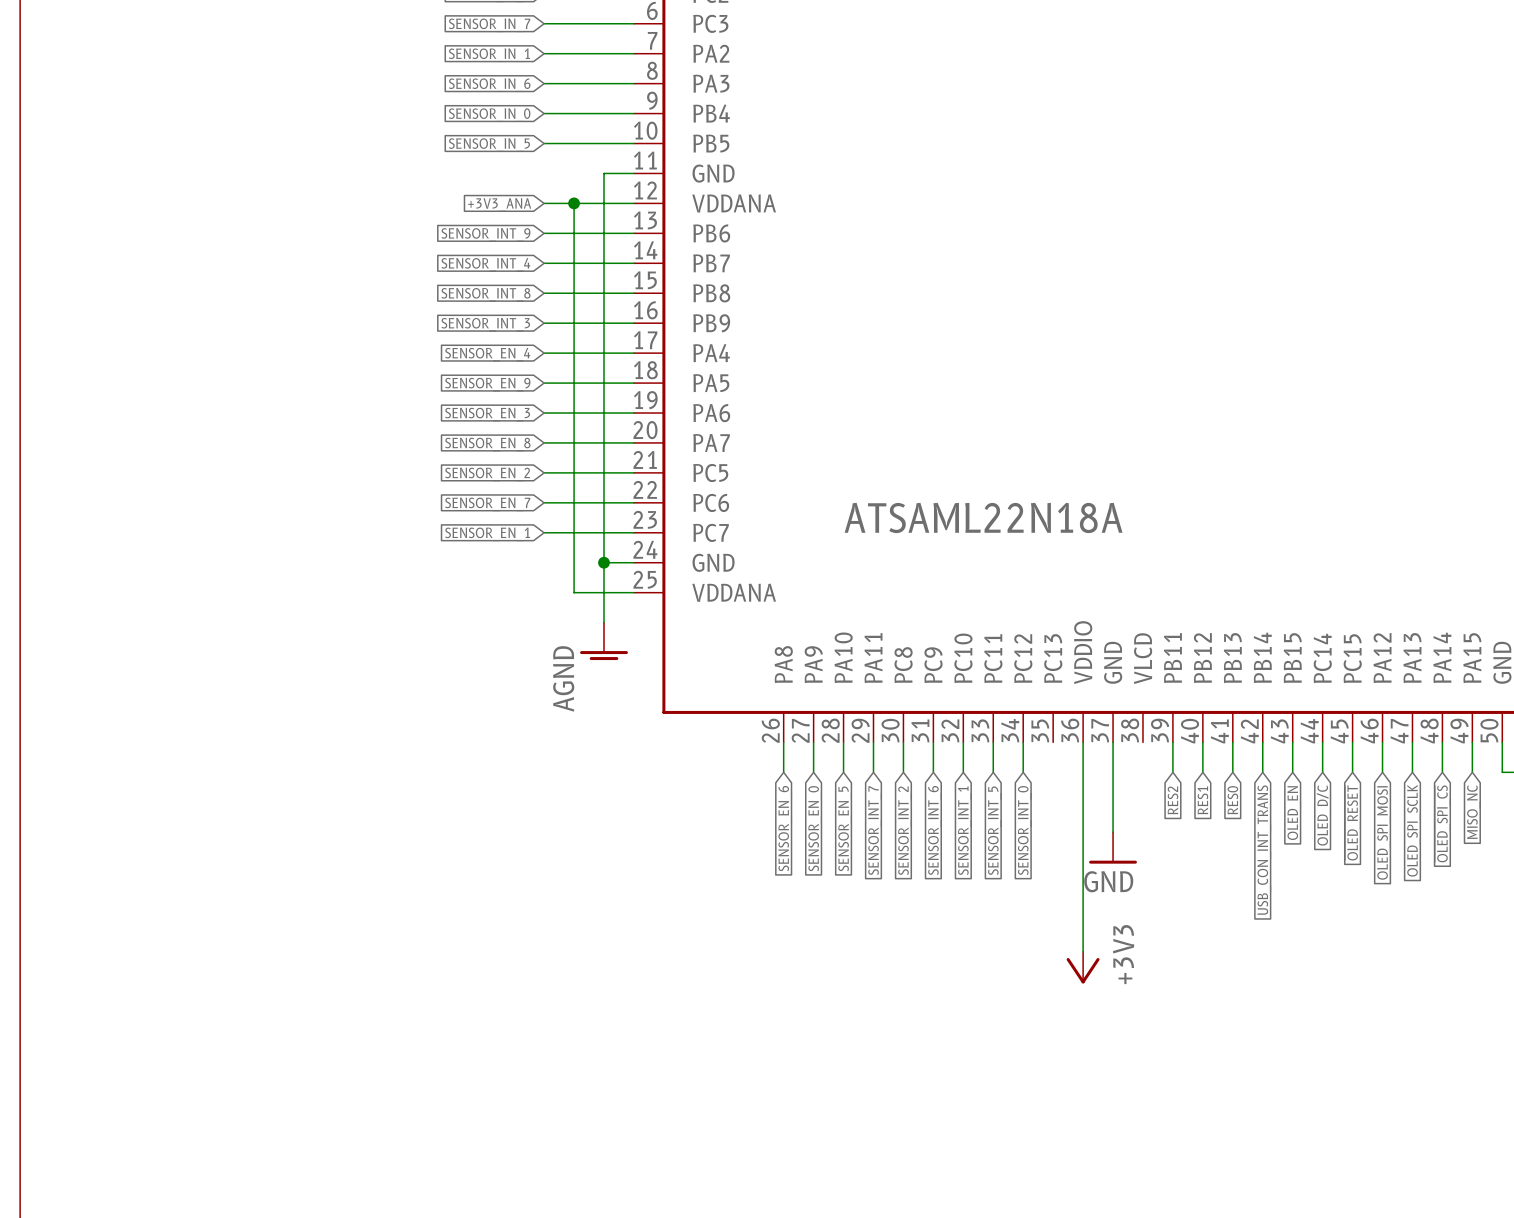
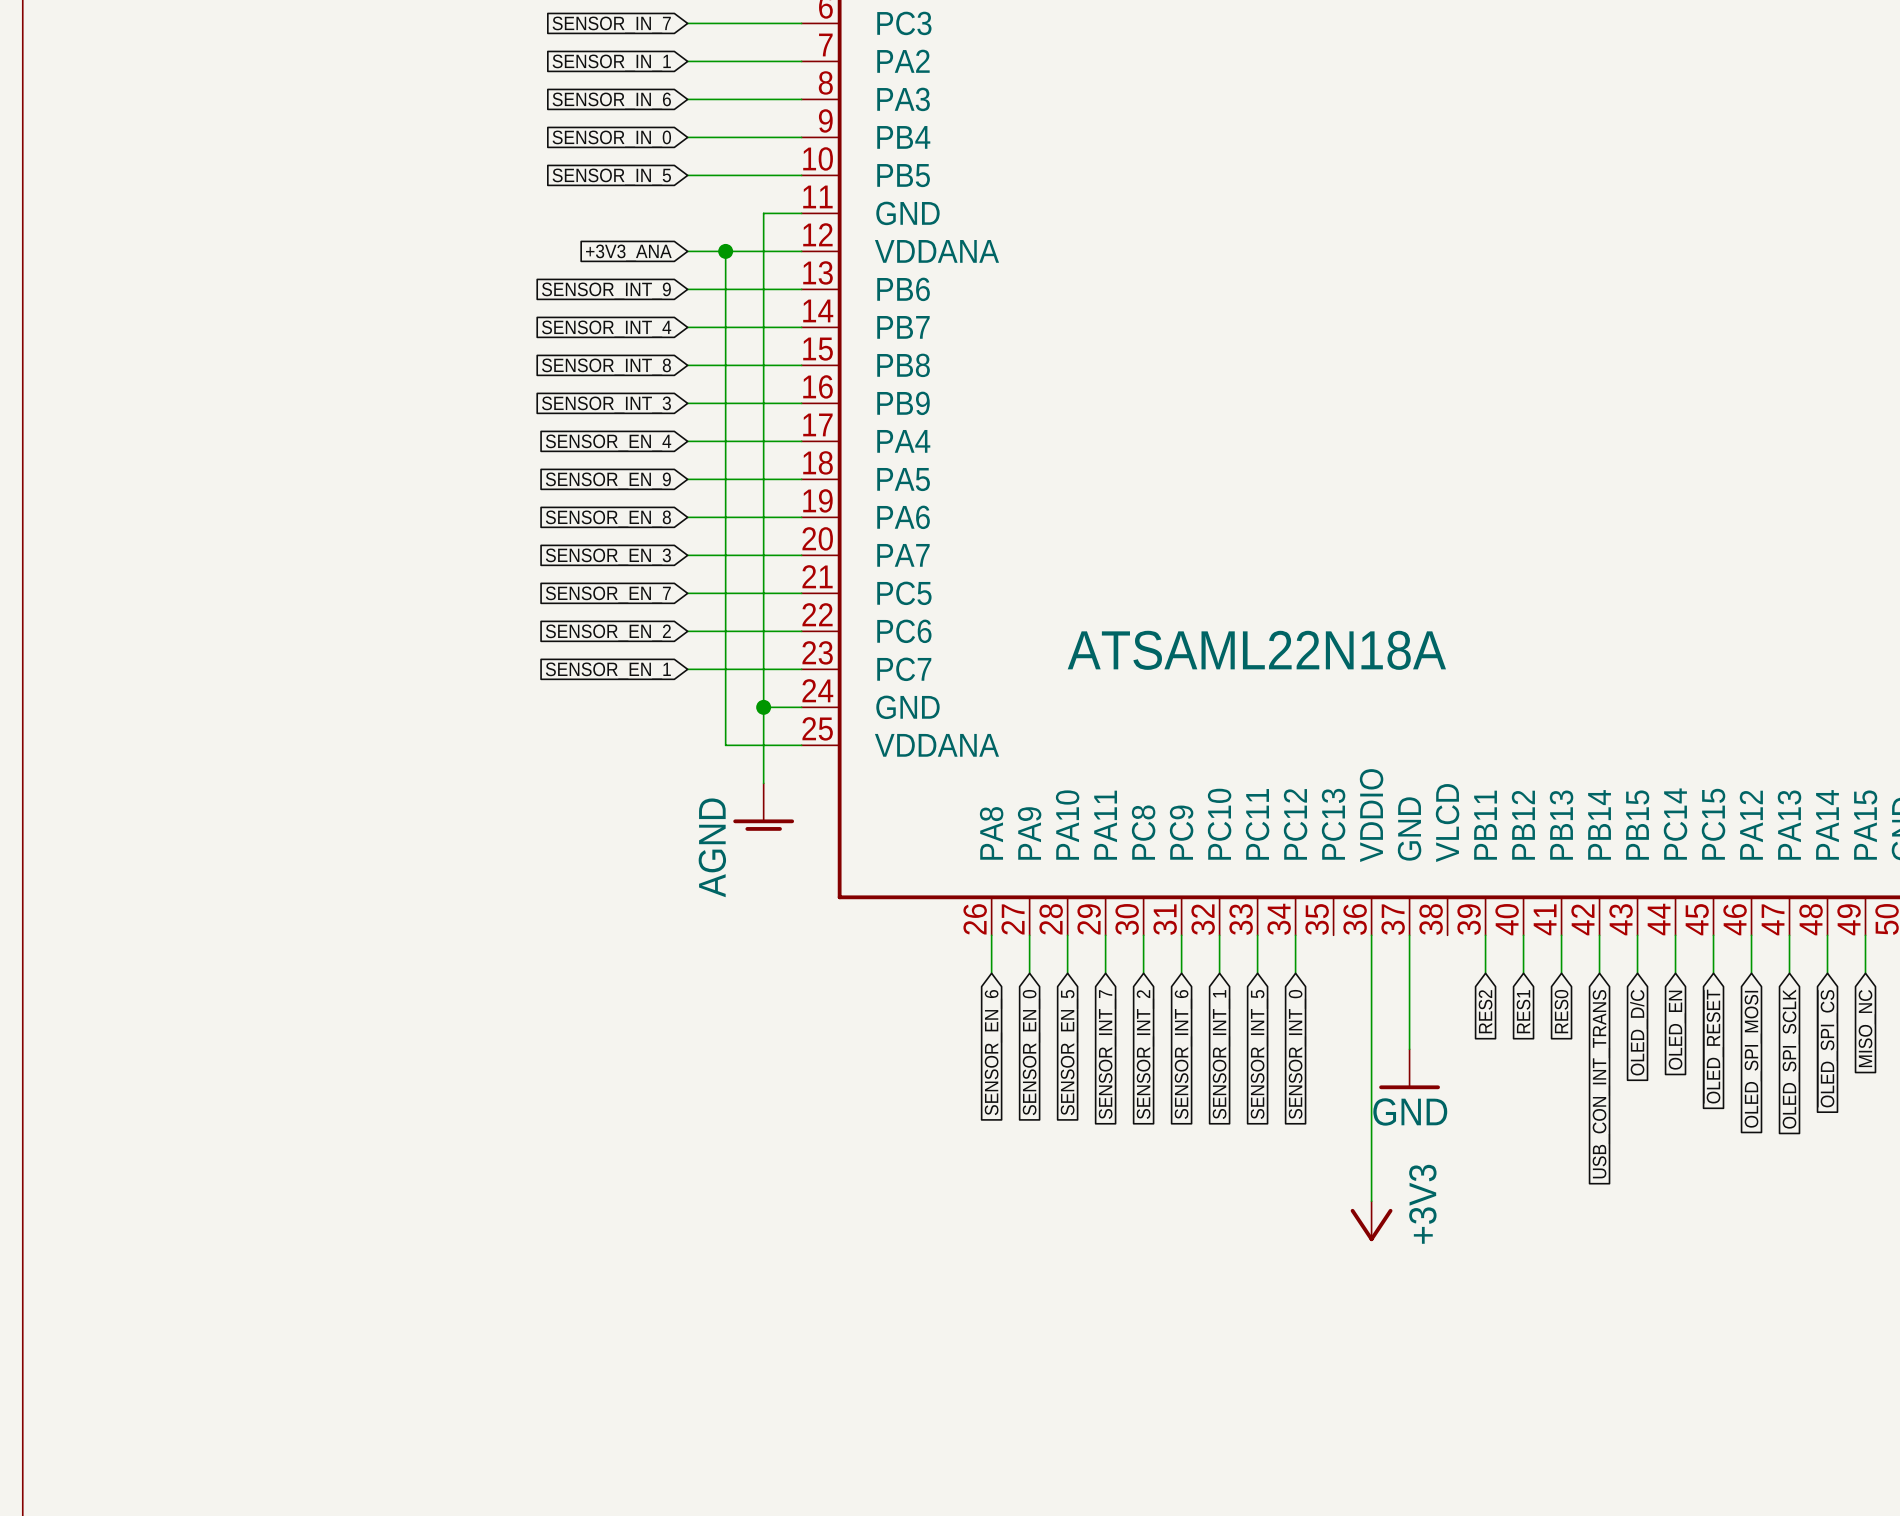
global label: SENSOR_EN_3 (487, 414) -> SENSOR_EN_8 (608, 519)
global label: SENSOR_EN_8 (487, 444) -> SENSOR_EN_3 (608, 557)
global label: SENSOR_EN_2 (487, 474) -> SENSOR_EN_7 (608, 595)
global label: SENSOR_EN_7 (487, 504) -> SENSOR_EN_2 (608, 633)
global label: OLED_EN (1294, 813) -> OLED_D/C (1639, 1032)
global label: OLED_D/C (1323, 815) -> OLED_EN (1677, 1030)

